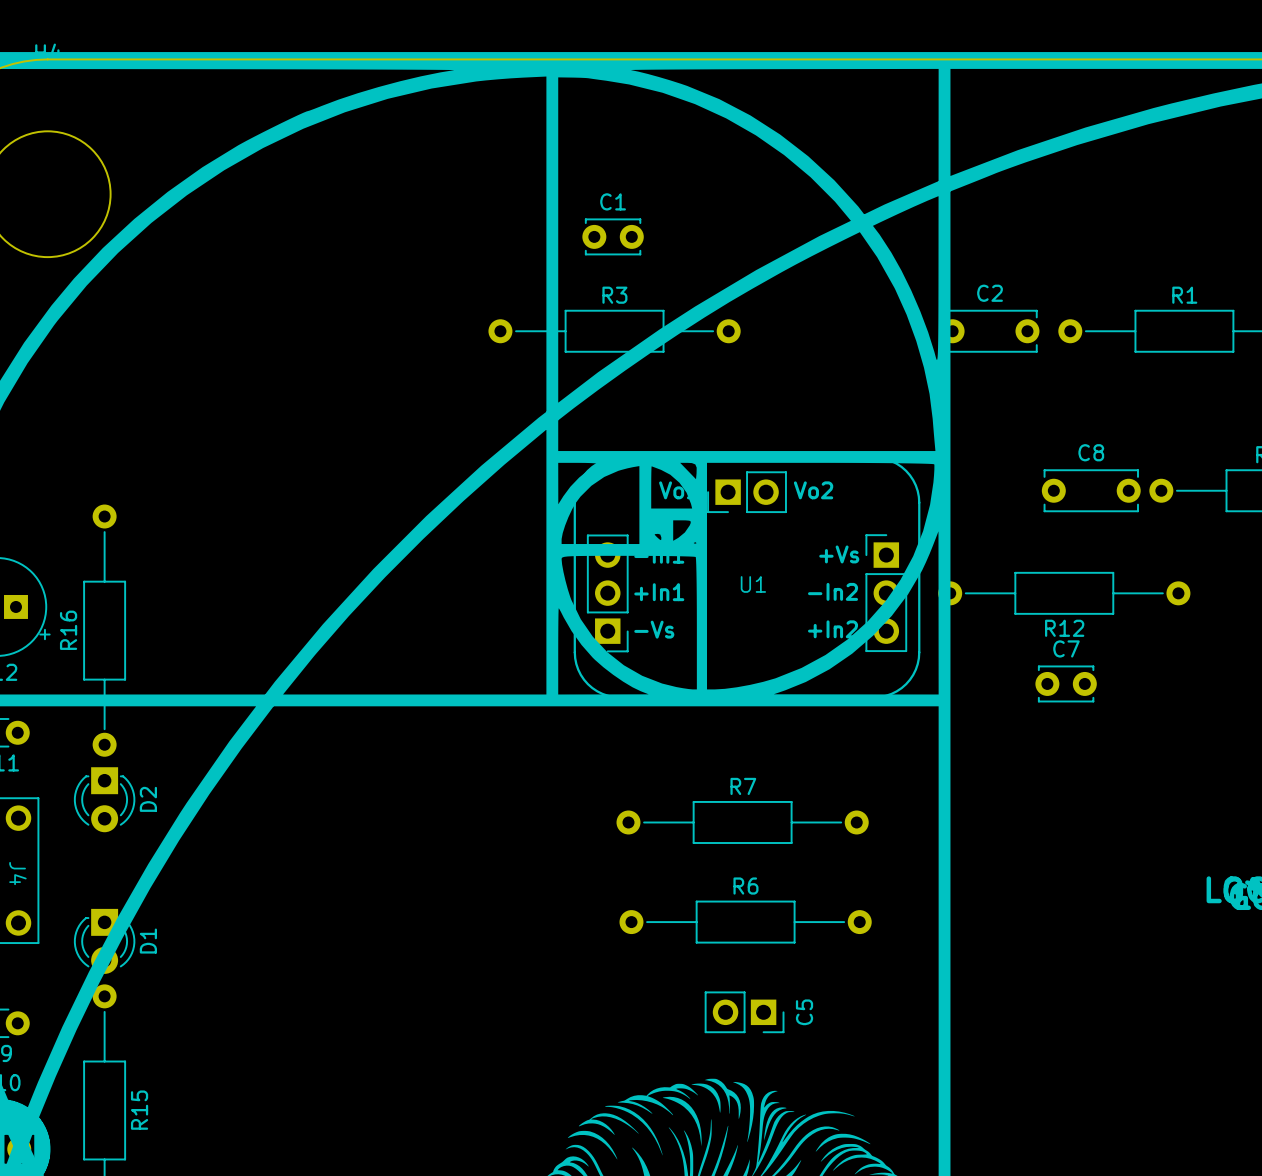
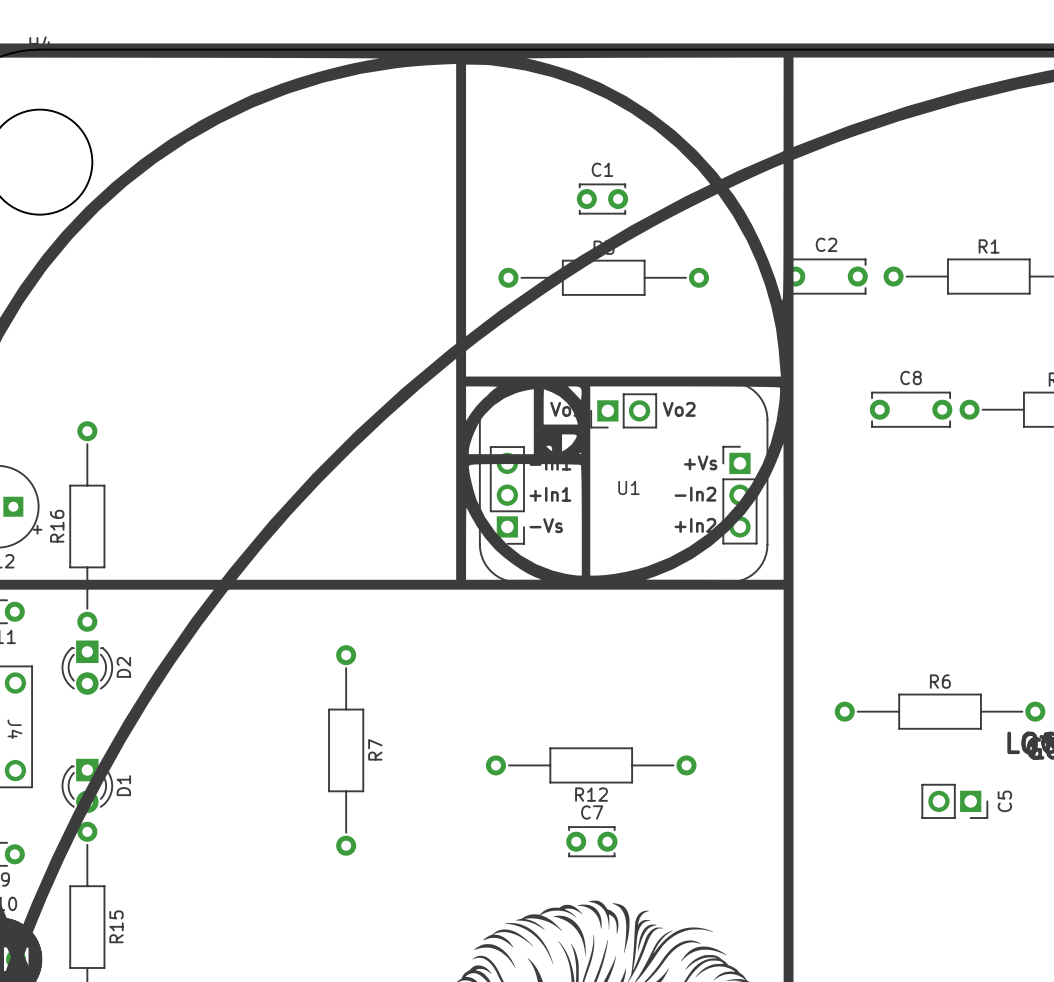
C1 position: (613, 236) -> (602, 199)
R3 position: (614, 331) -> (603, 277)
R12 position: (1064, 593) -> (591, 765)
C7 position: (1066, 683) -> (591, 841)
R7 rotation: 0° (742, 822) -> 90° clockwise (346, 750)
R7 position: (742, 822) -> (346, 750)
R6 position: (745, 922) -> (940, 711)
C5 position: (744, 1012) -> (954, 801)

